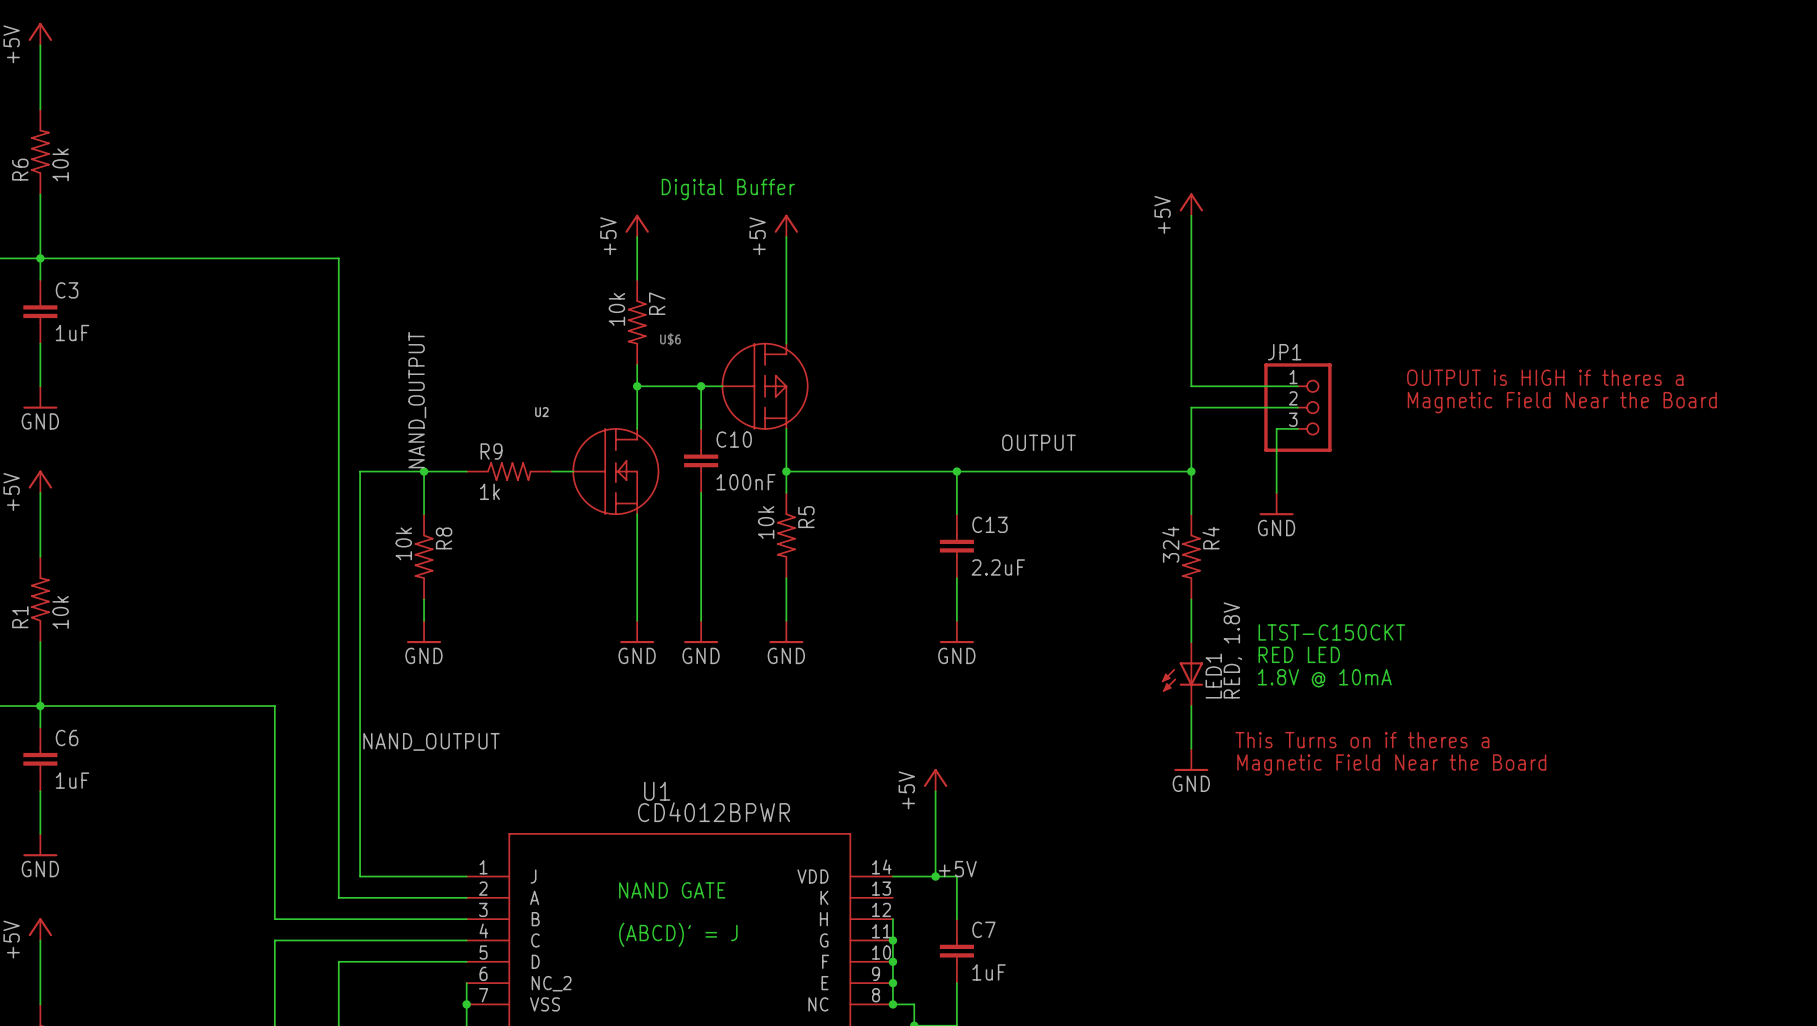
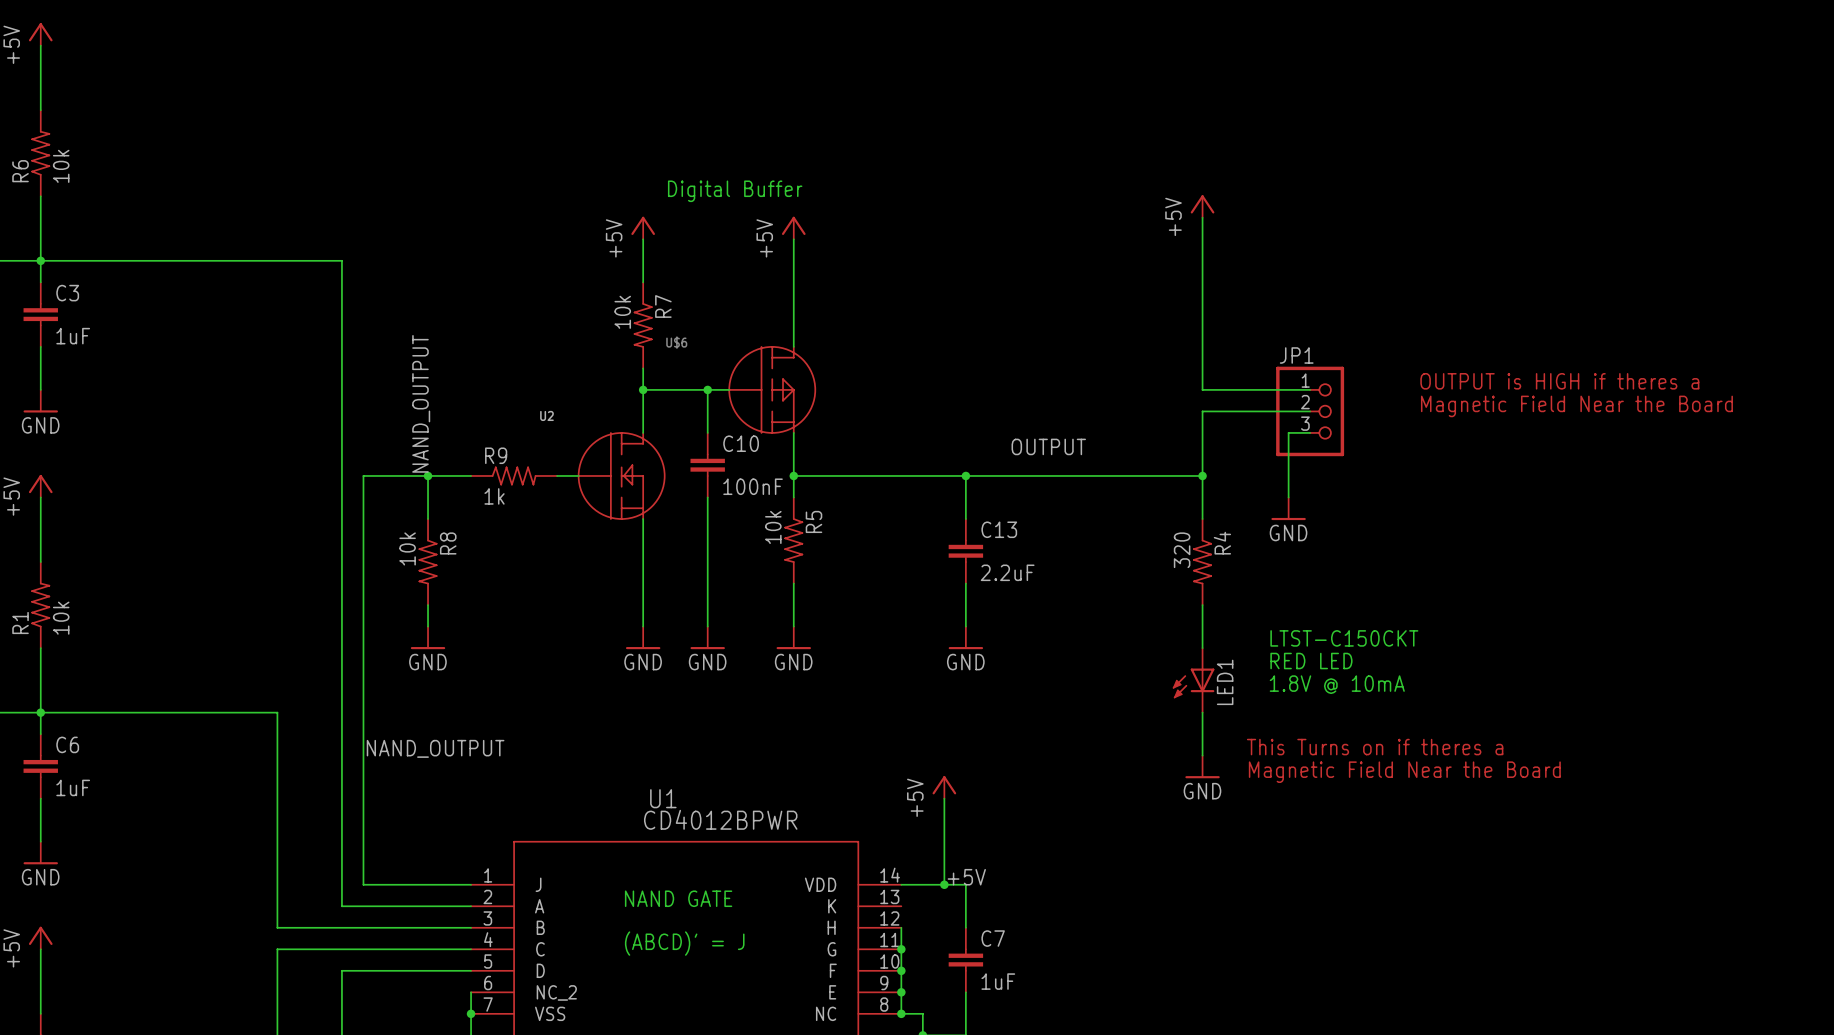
R4 value: 324 (1170, 544) -> 320 (1182, 550)
LED1 value: RED, 1.8V (1232, 650) -> none

